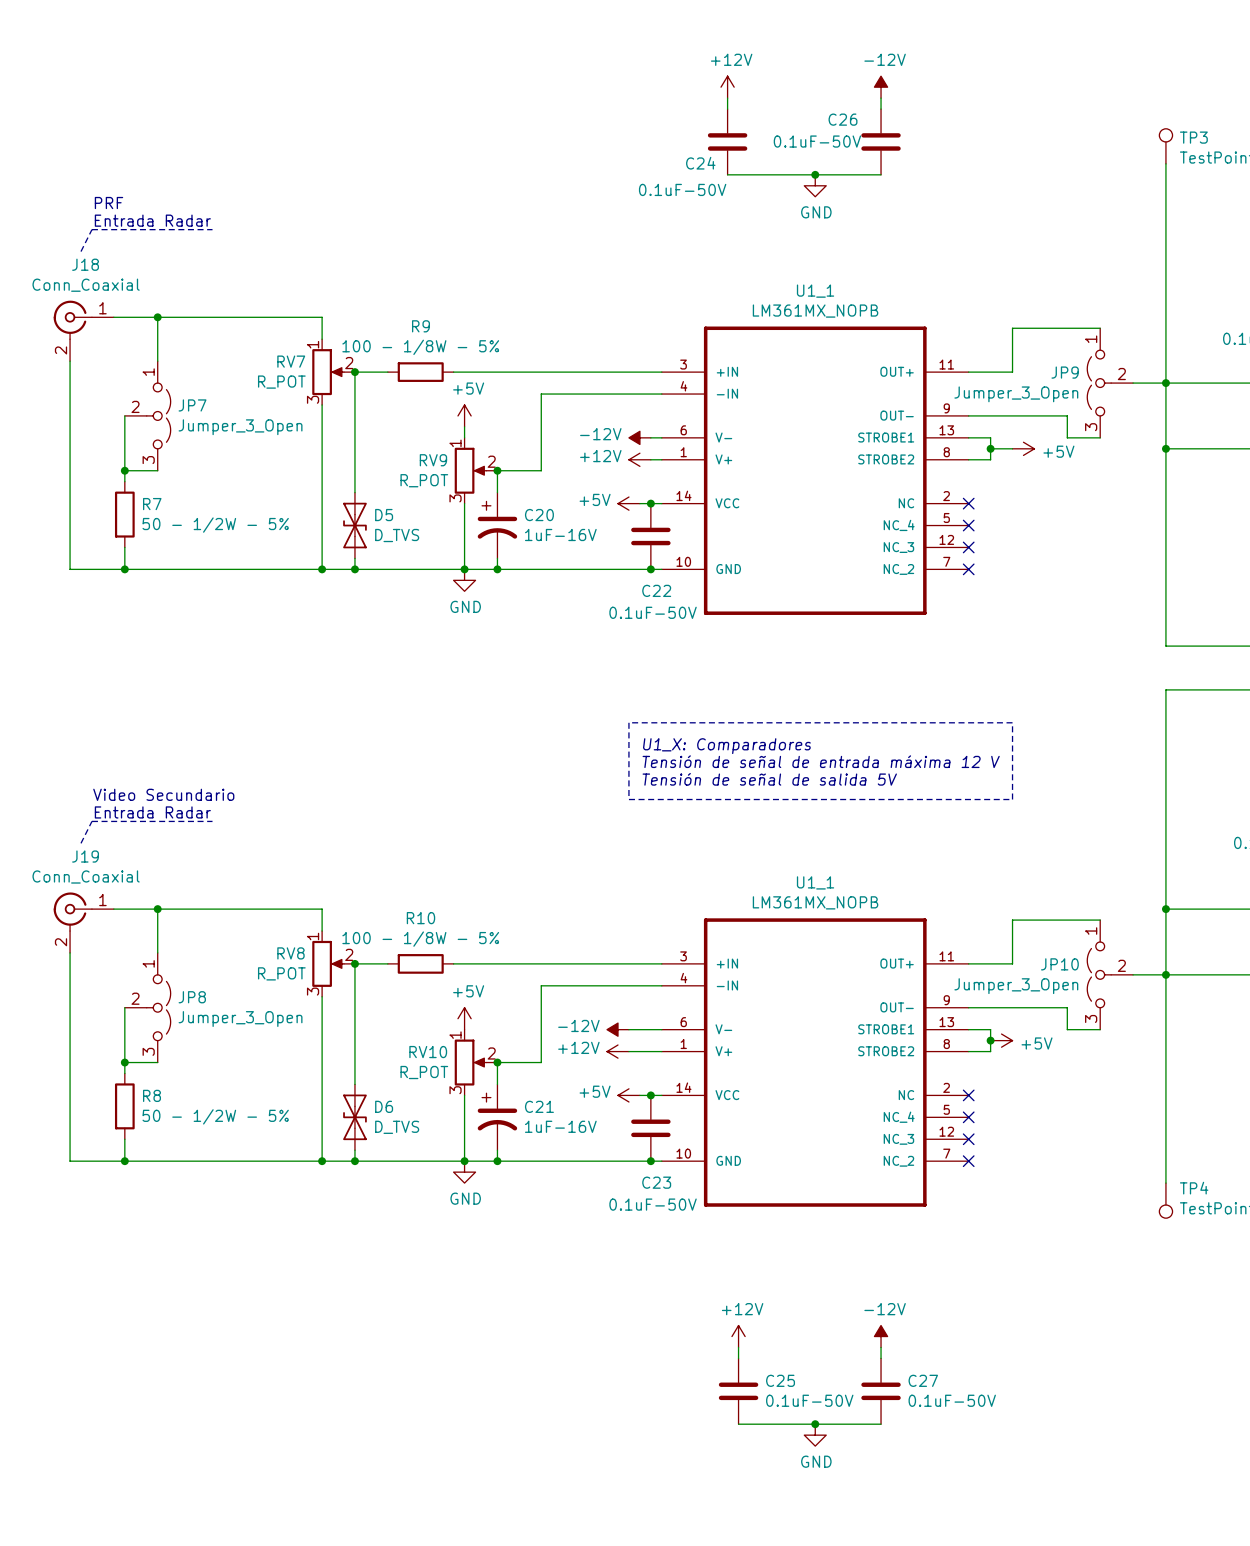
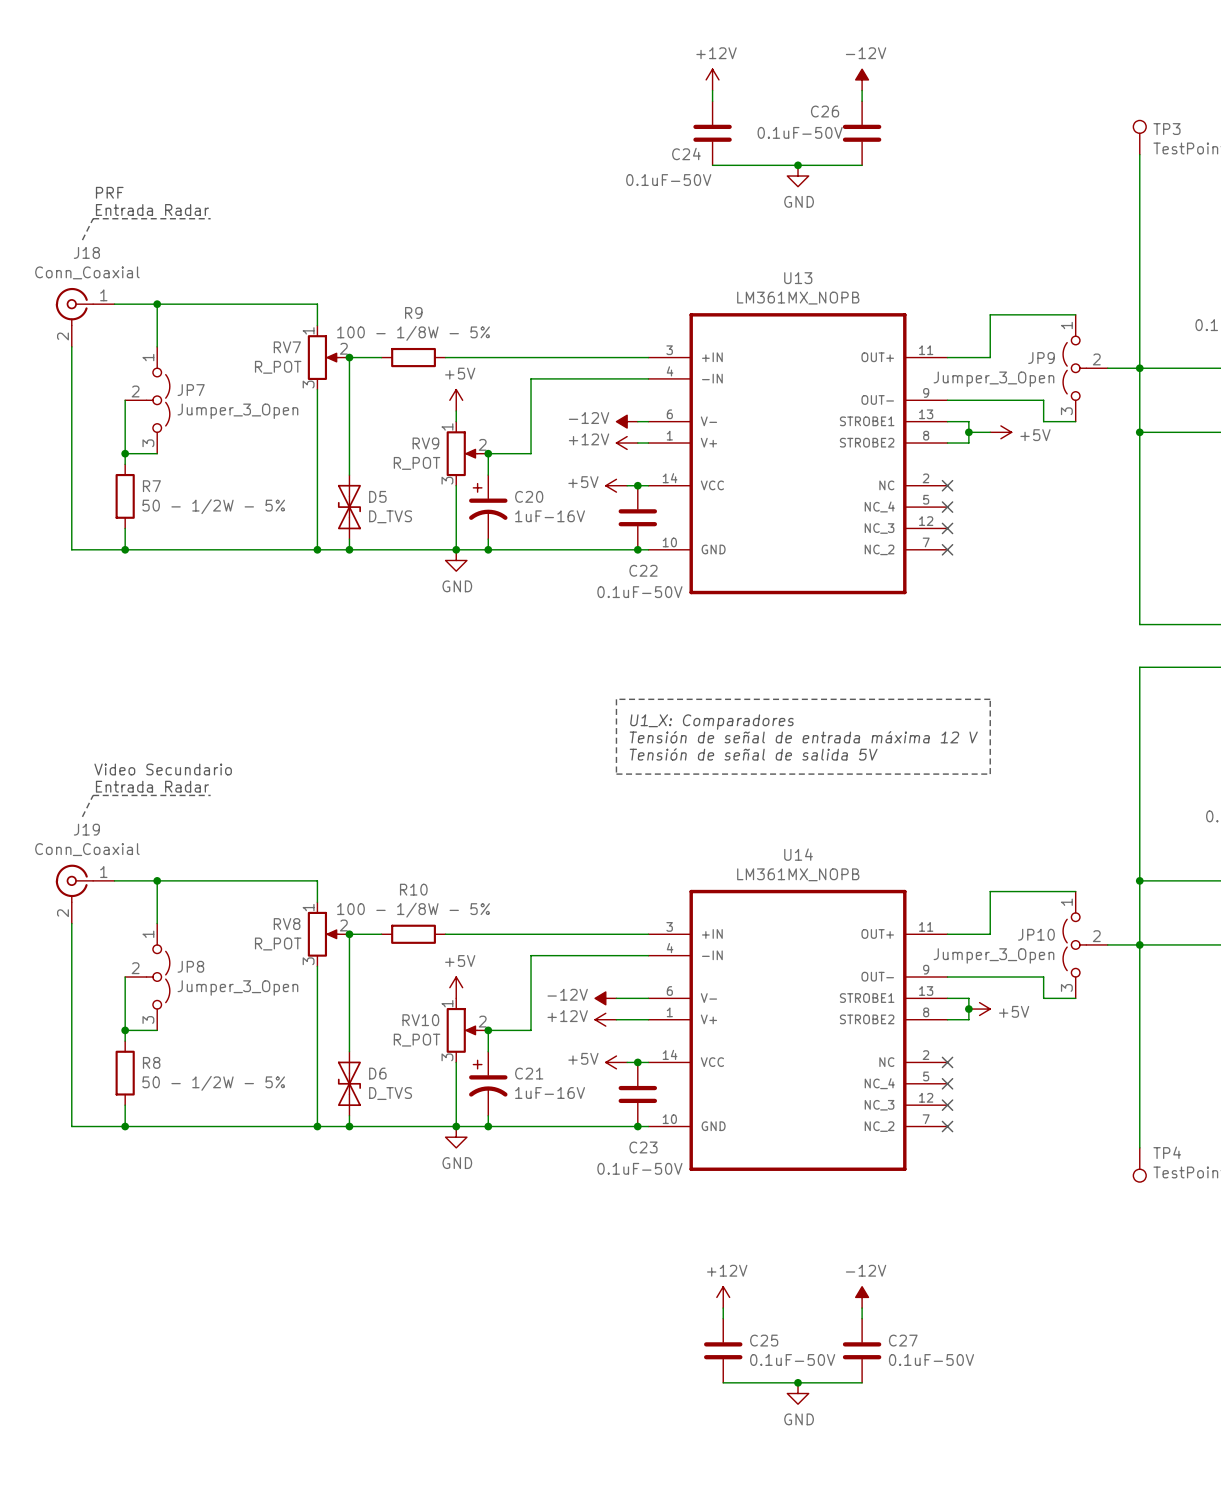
U1_1 name: U1_1 (815, 291) -> U13 (798, 278)
U1_1 name: U1_1 (815, 882) -> U14 (798, 854)

